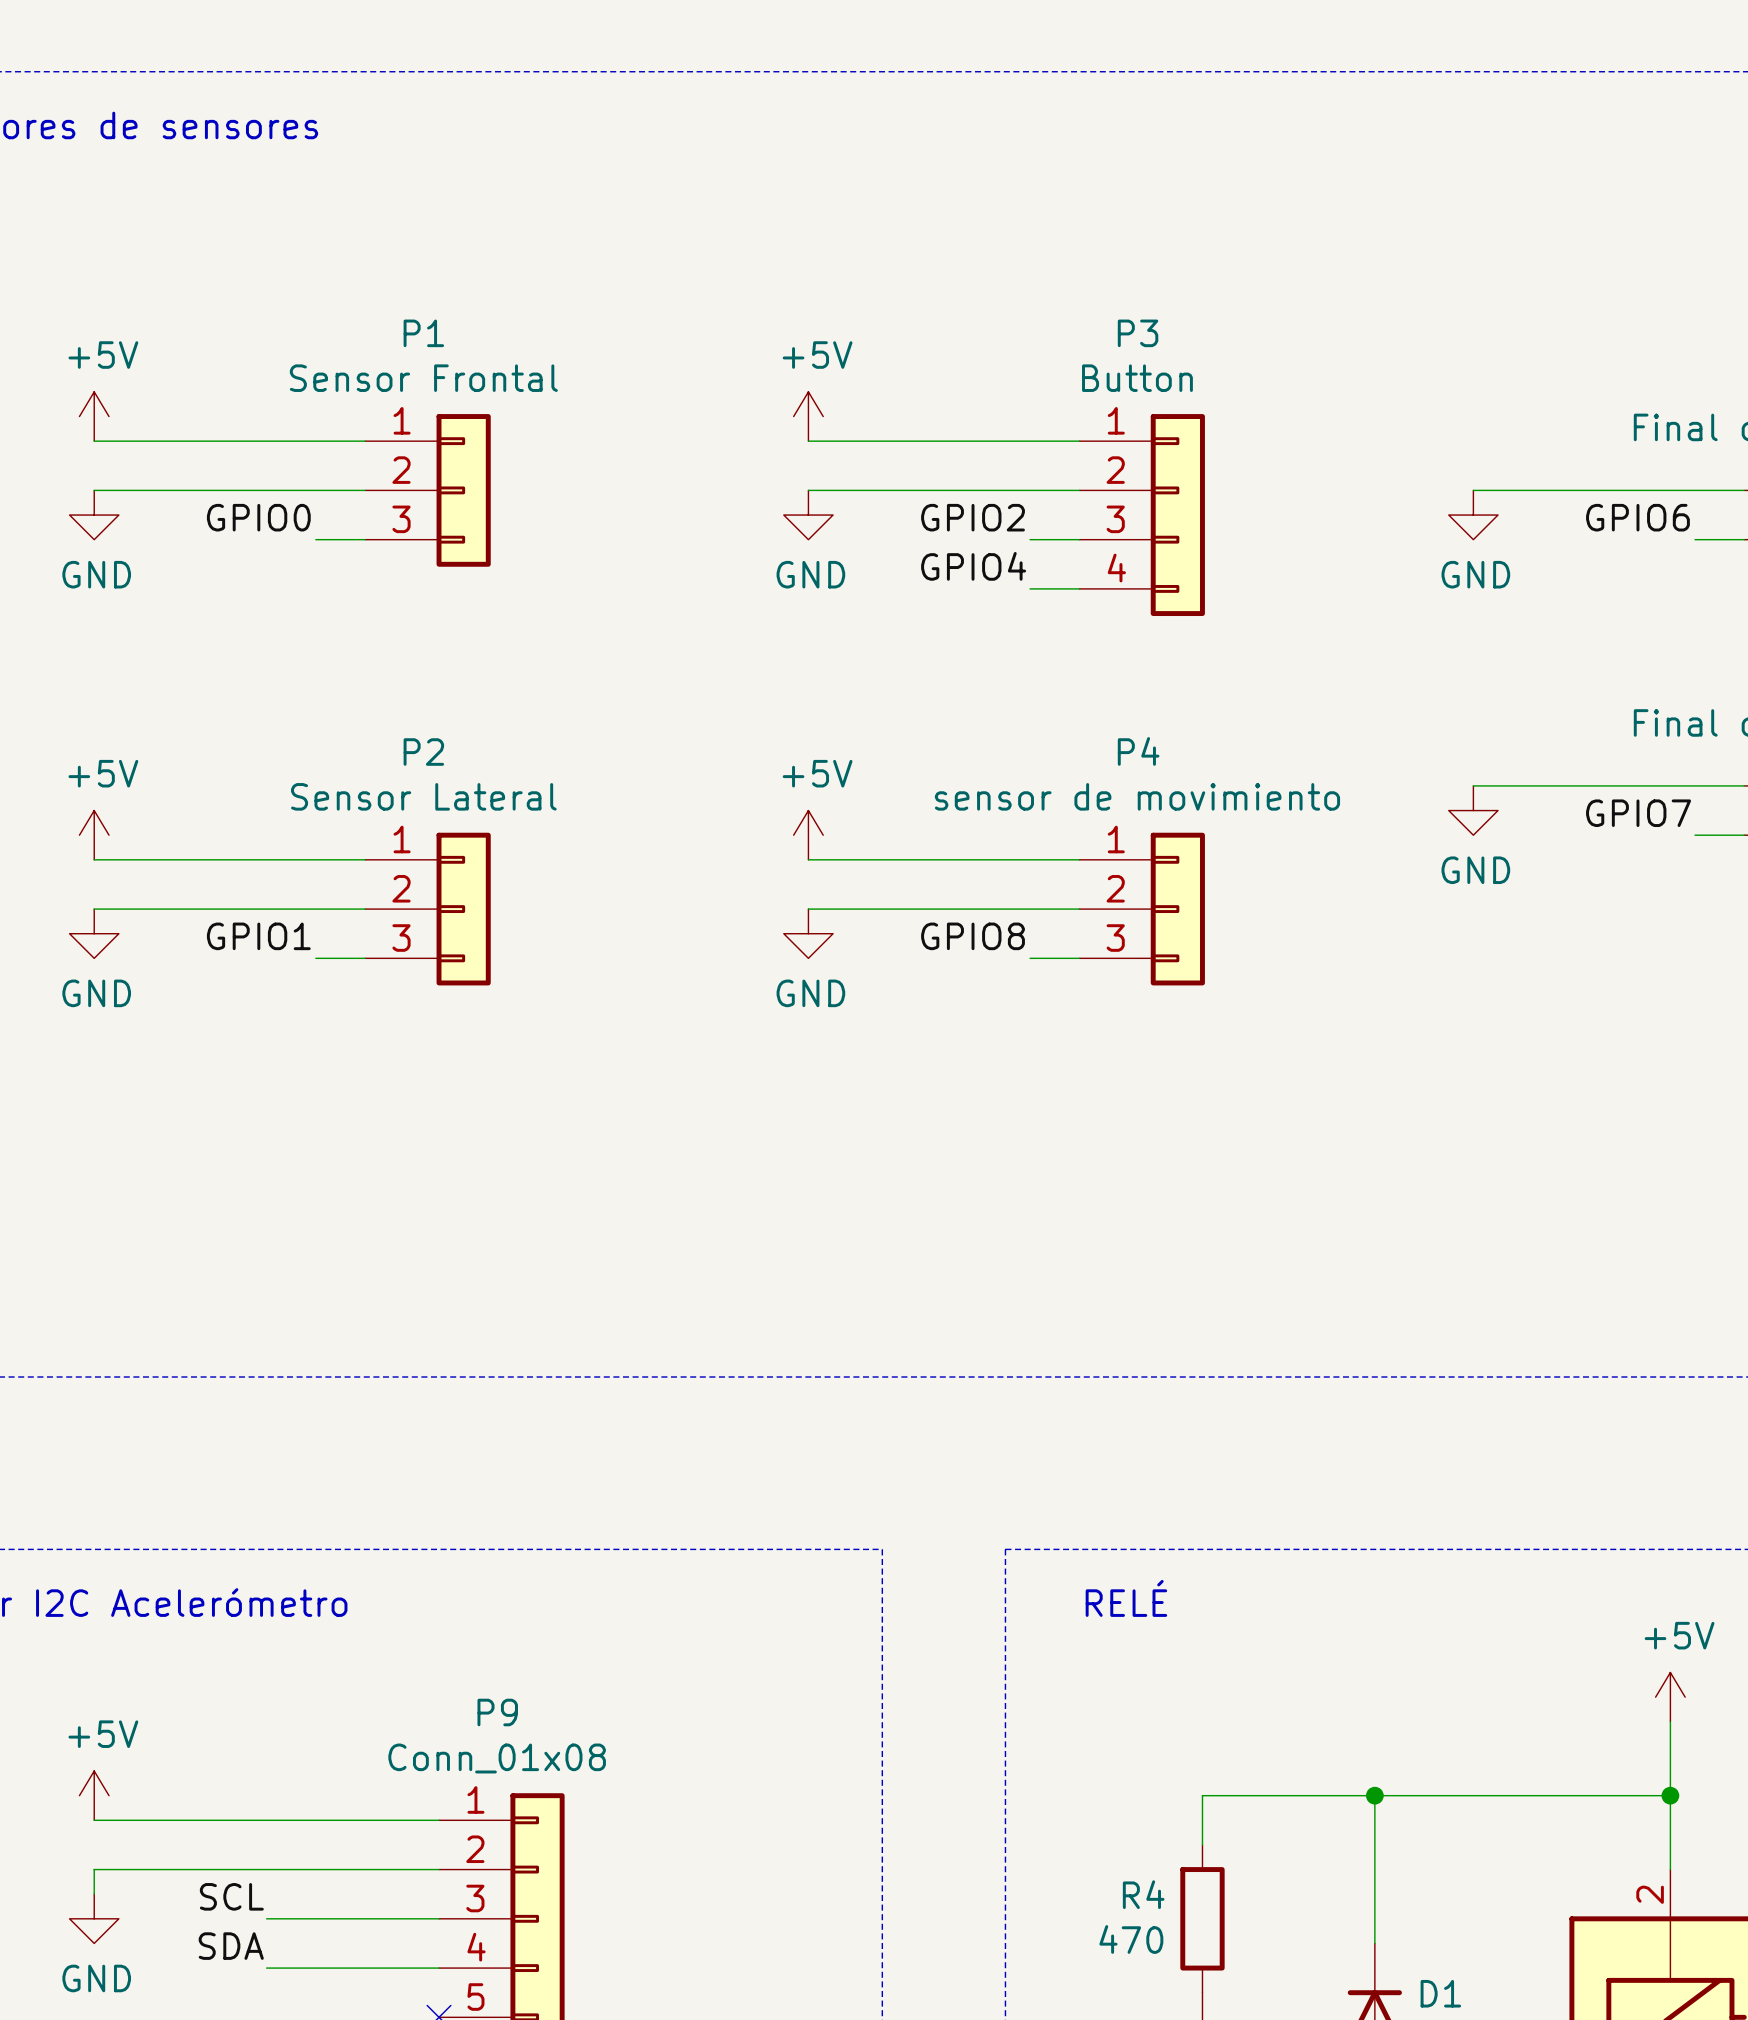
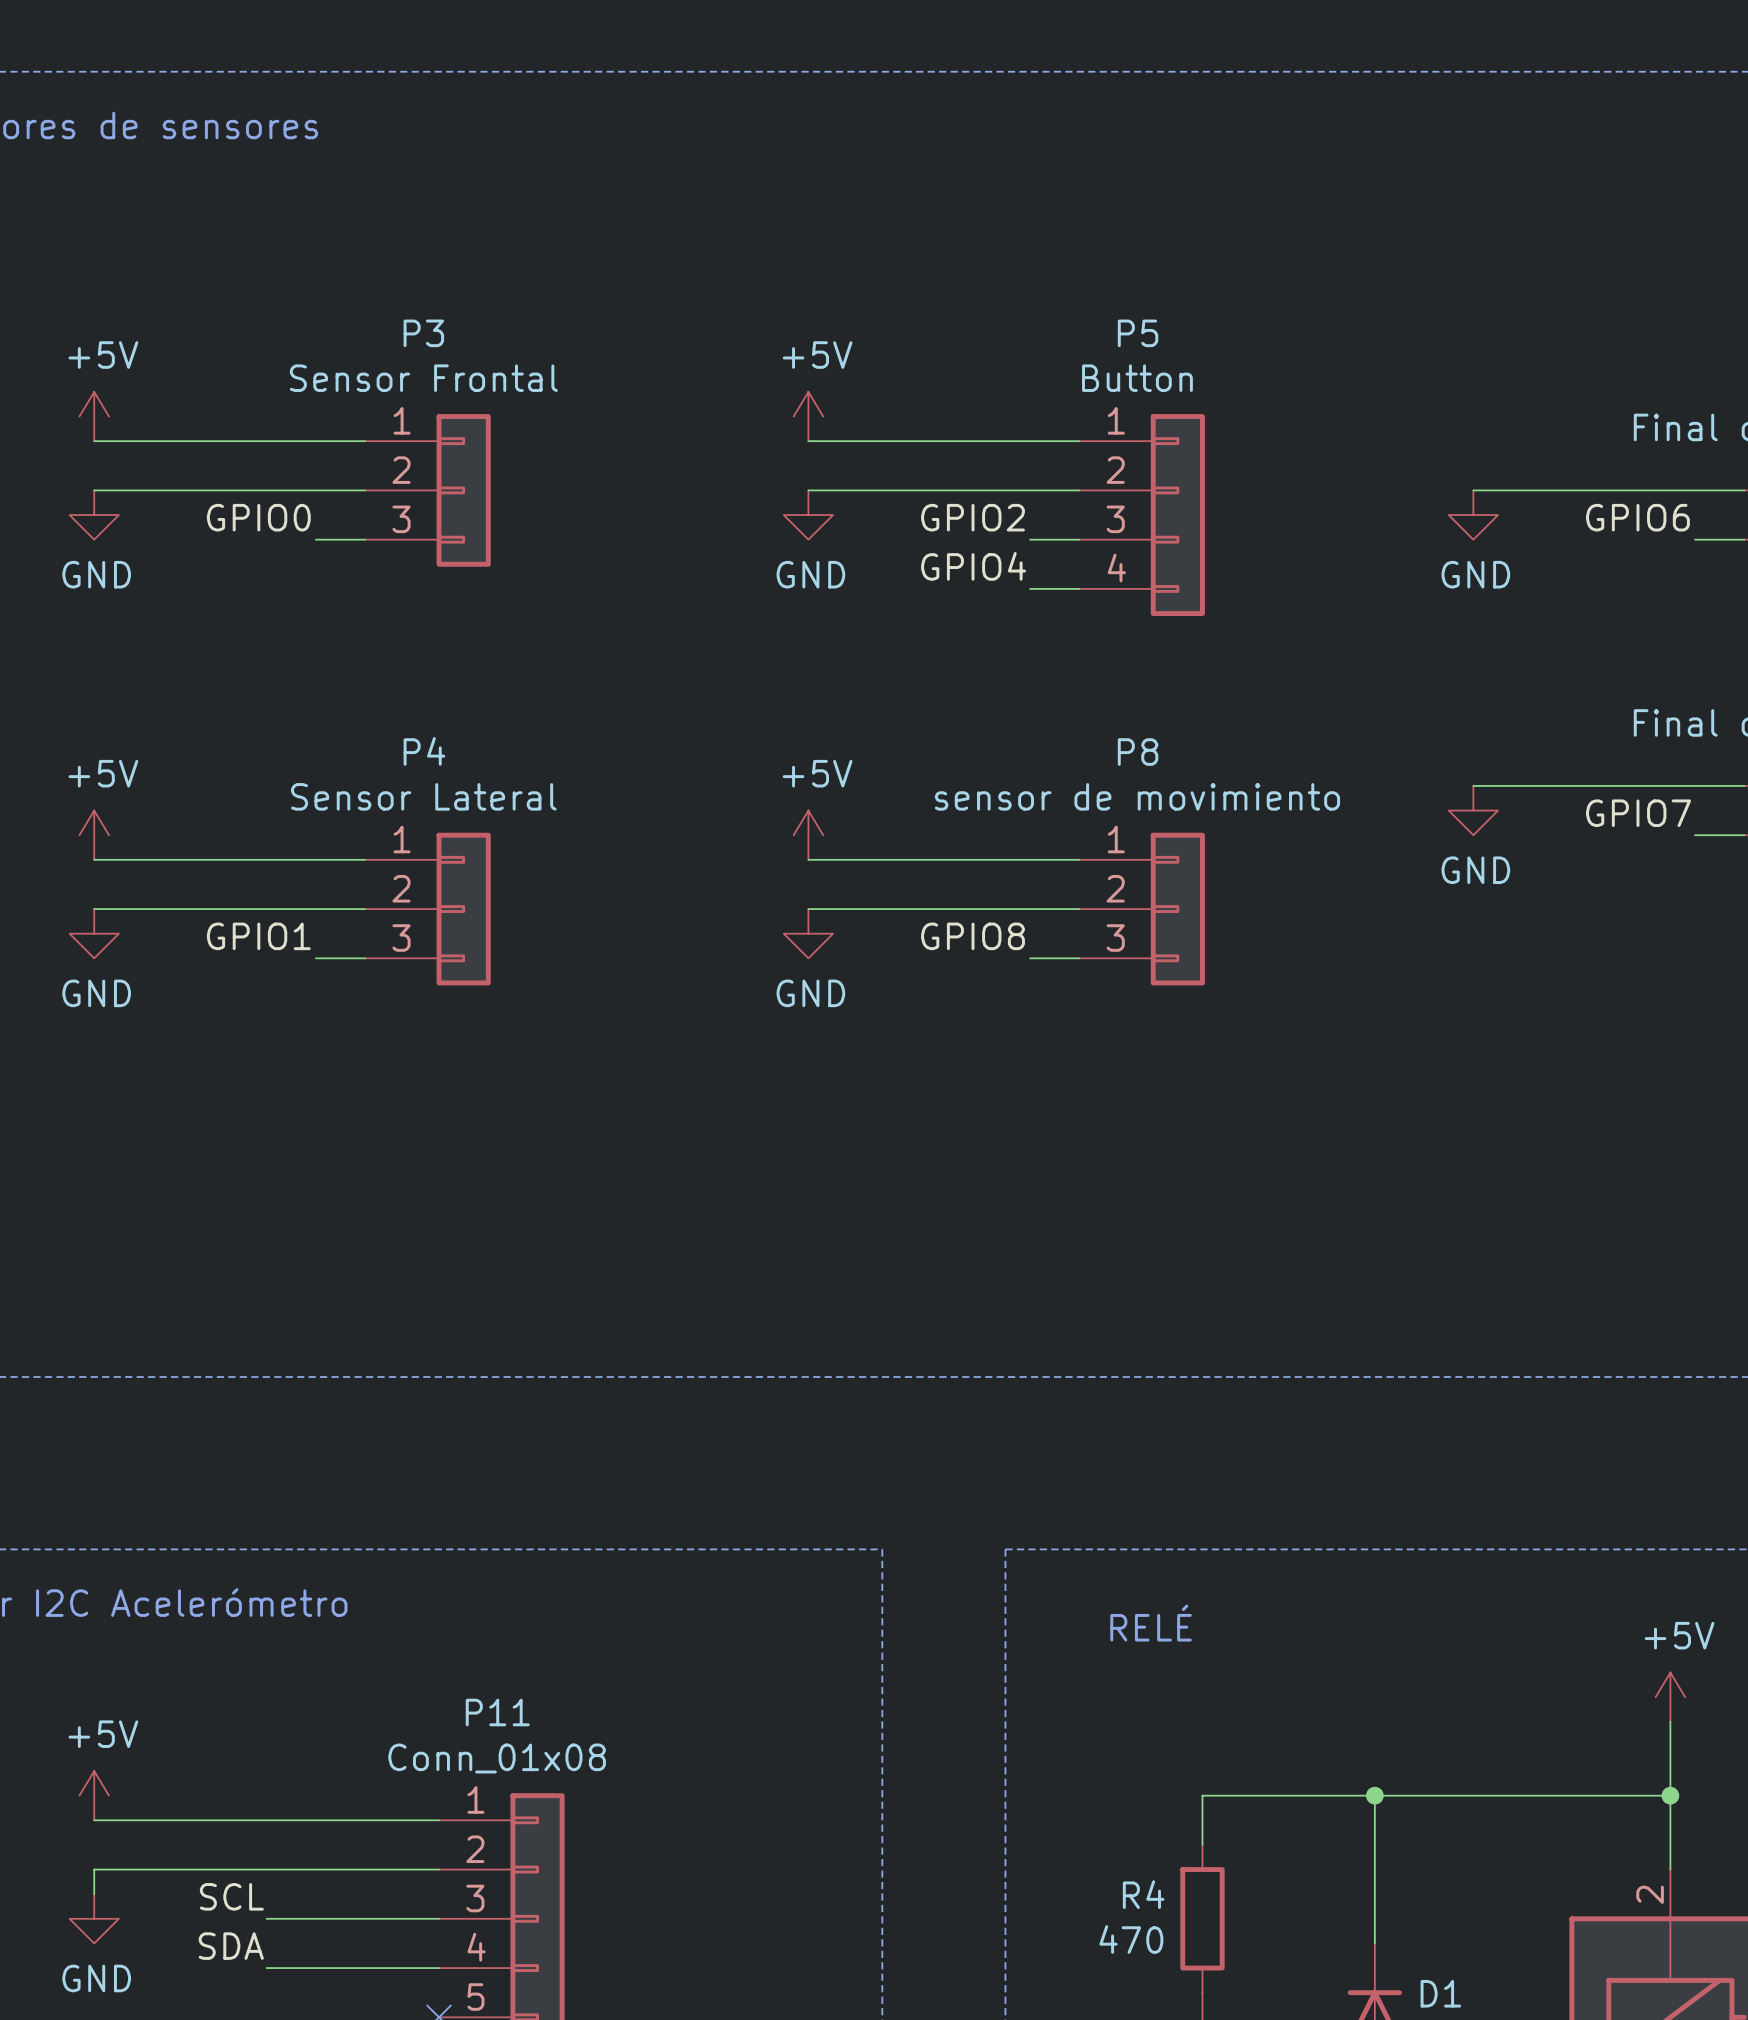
P1 name: P1 (423, 333) -> P3 (423, 333)
P3 name: P3 (1138, 333) -> P5 (1138, 333)
P4 name: P4 (1138, 751) -> P8 (1138, 752)
P2 name: P2 (423, 752) -> P4 (424, 751)
text position: RELÉ (1126, 1598) -> RELÉ (1151, 1623)
P9 name: P9 (497, 1712) -> P11 (497, 1712)

